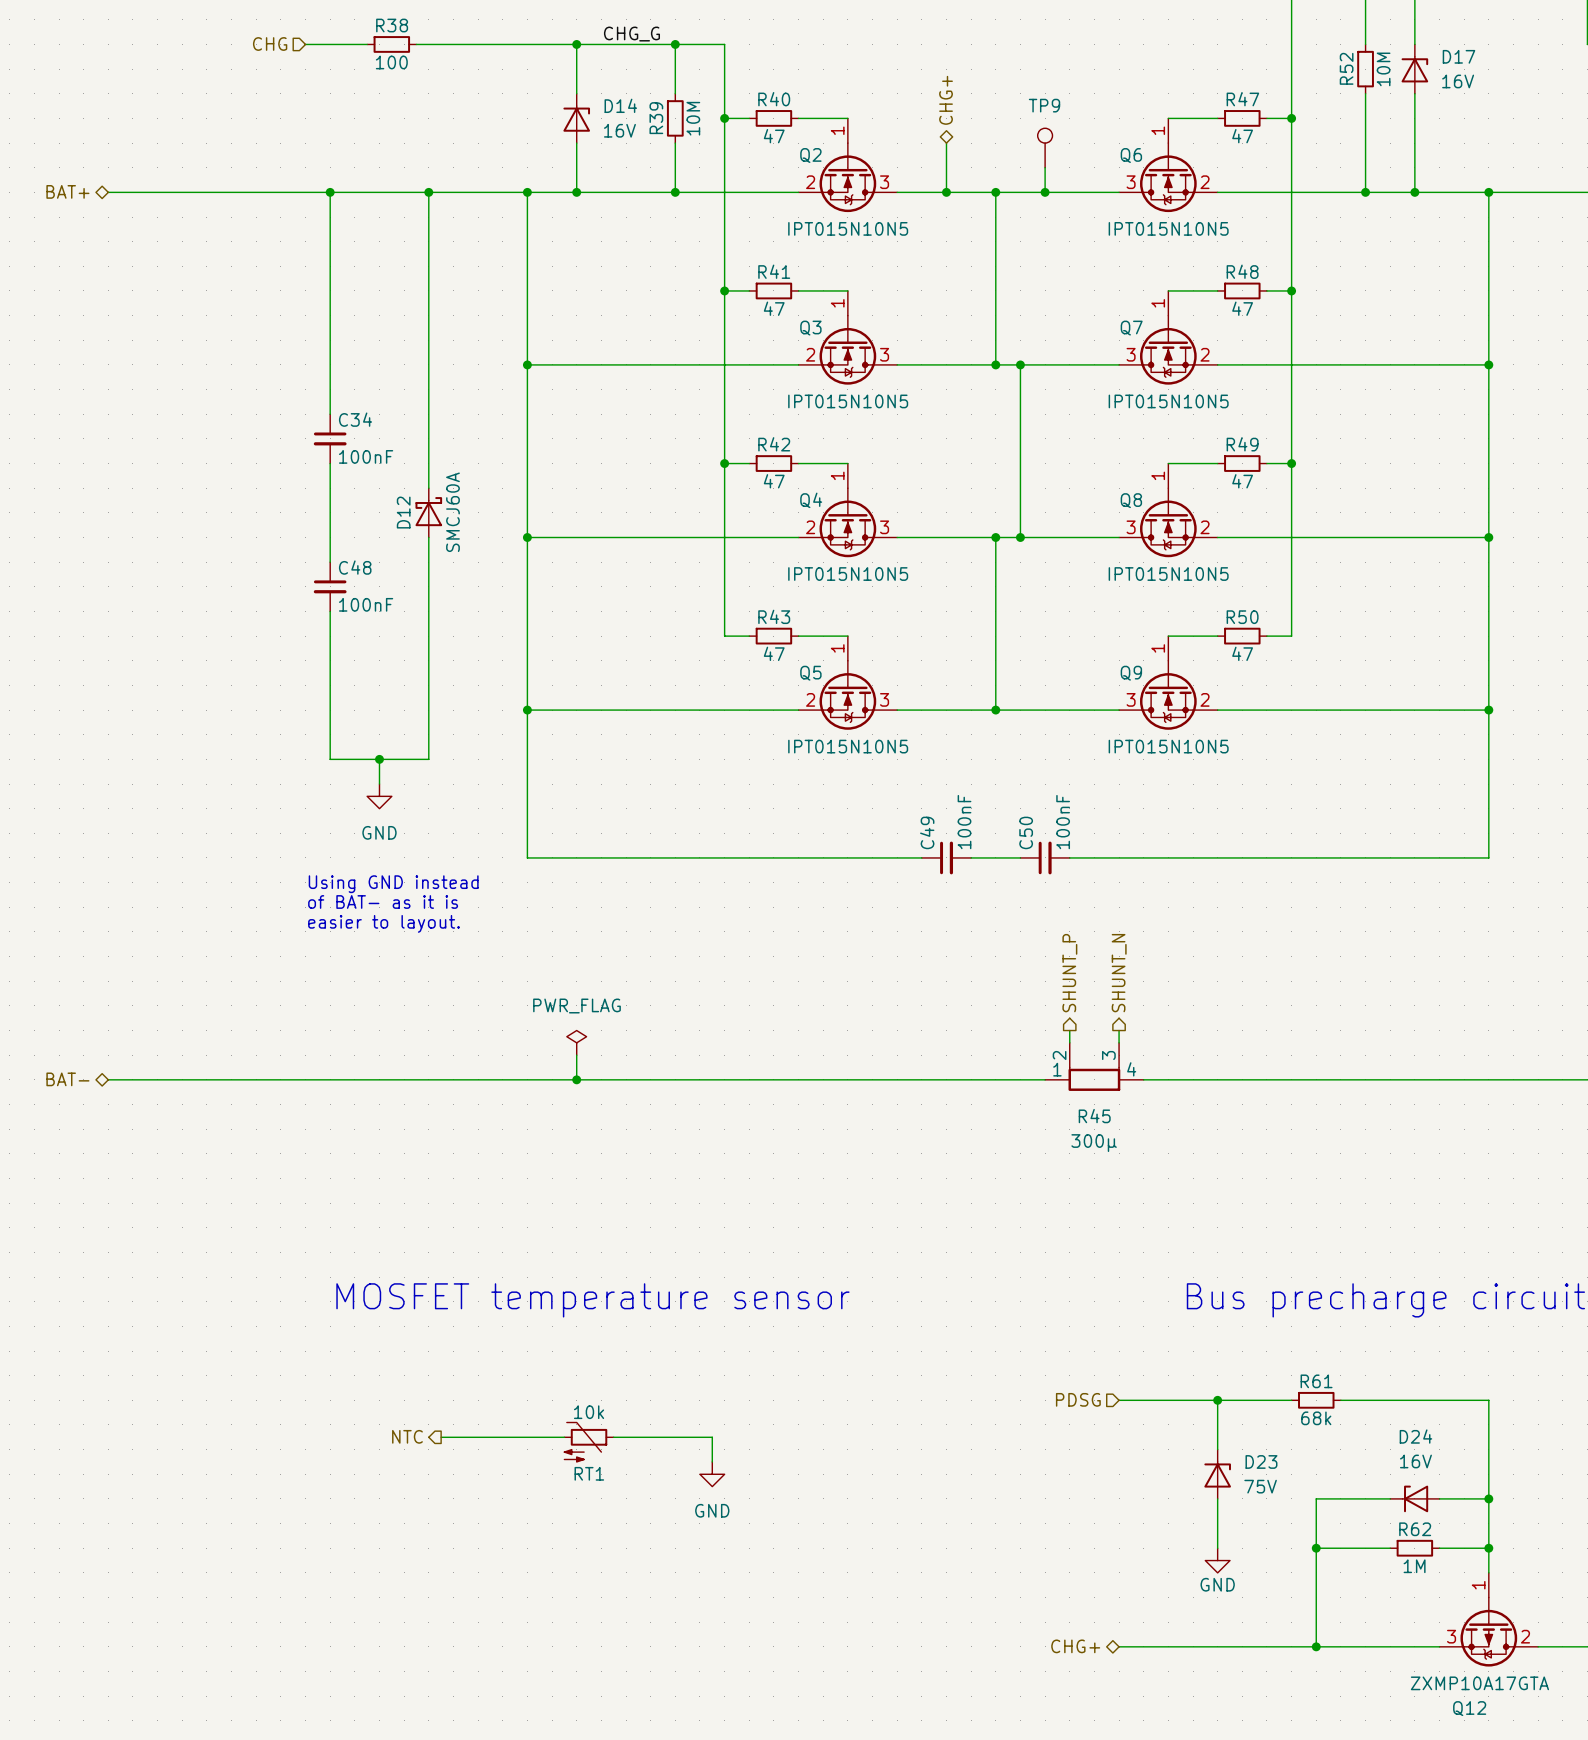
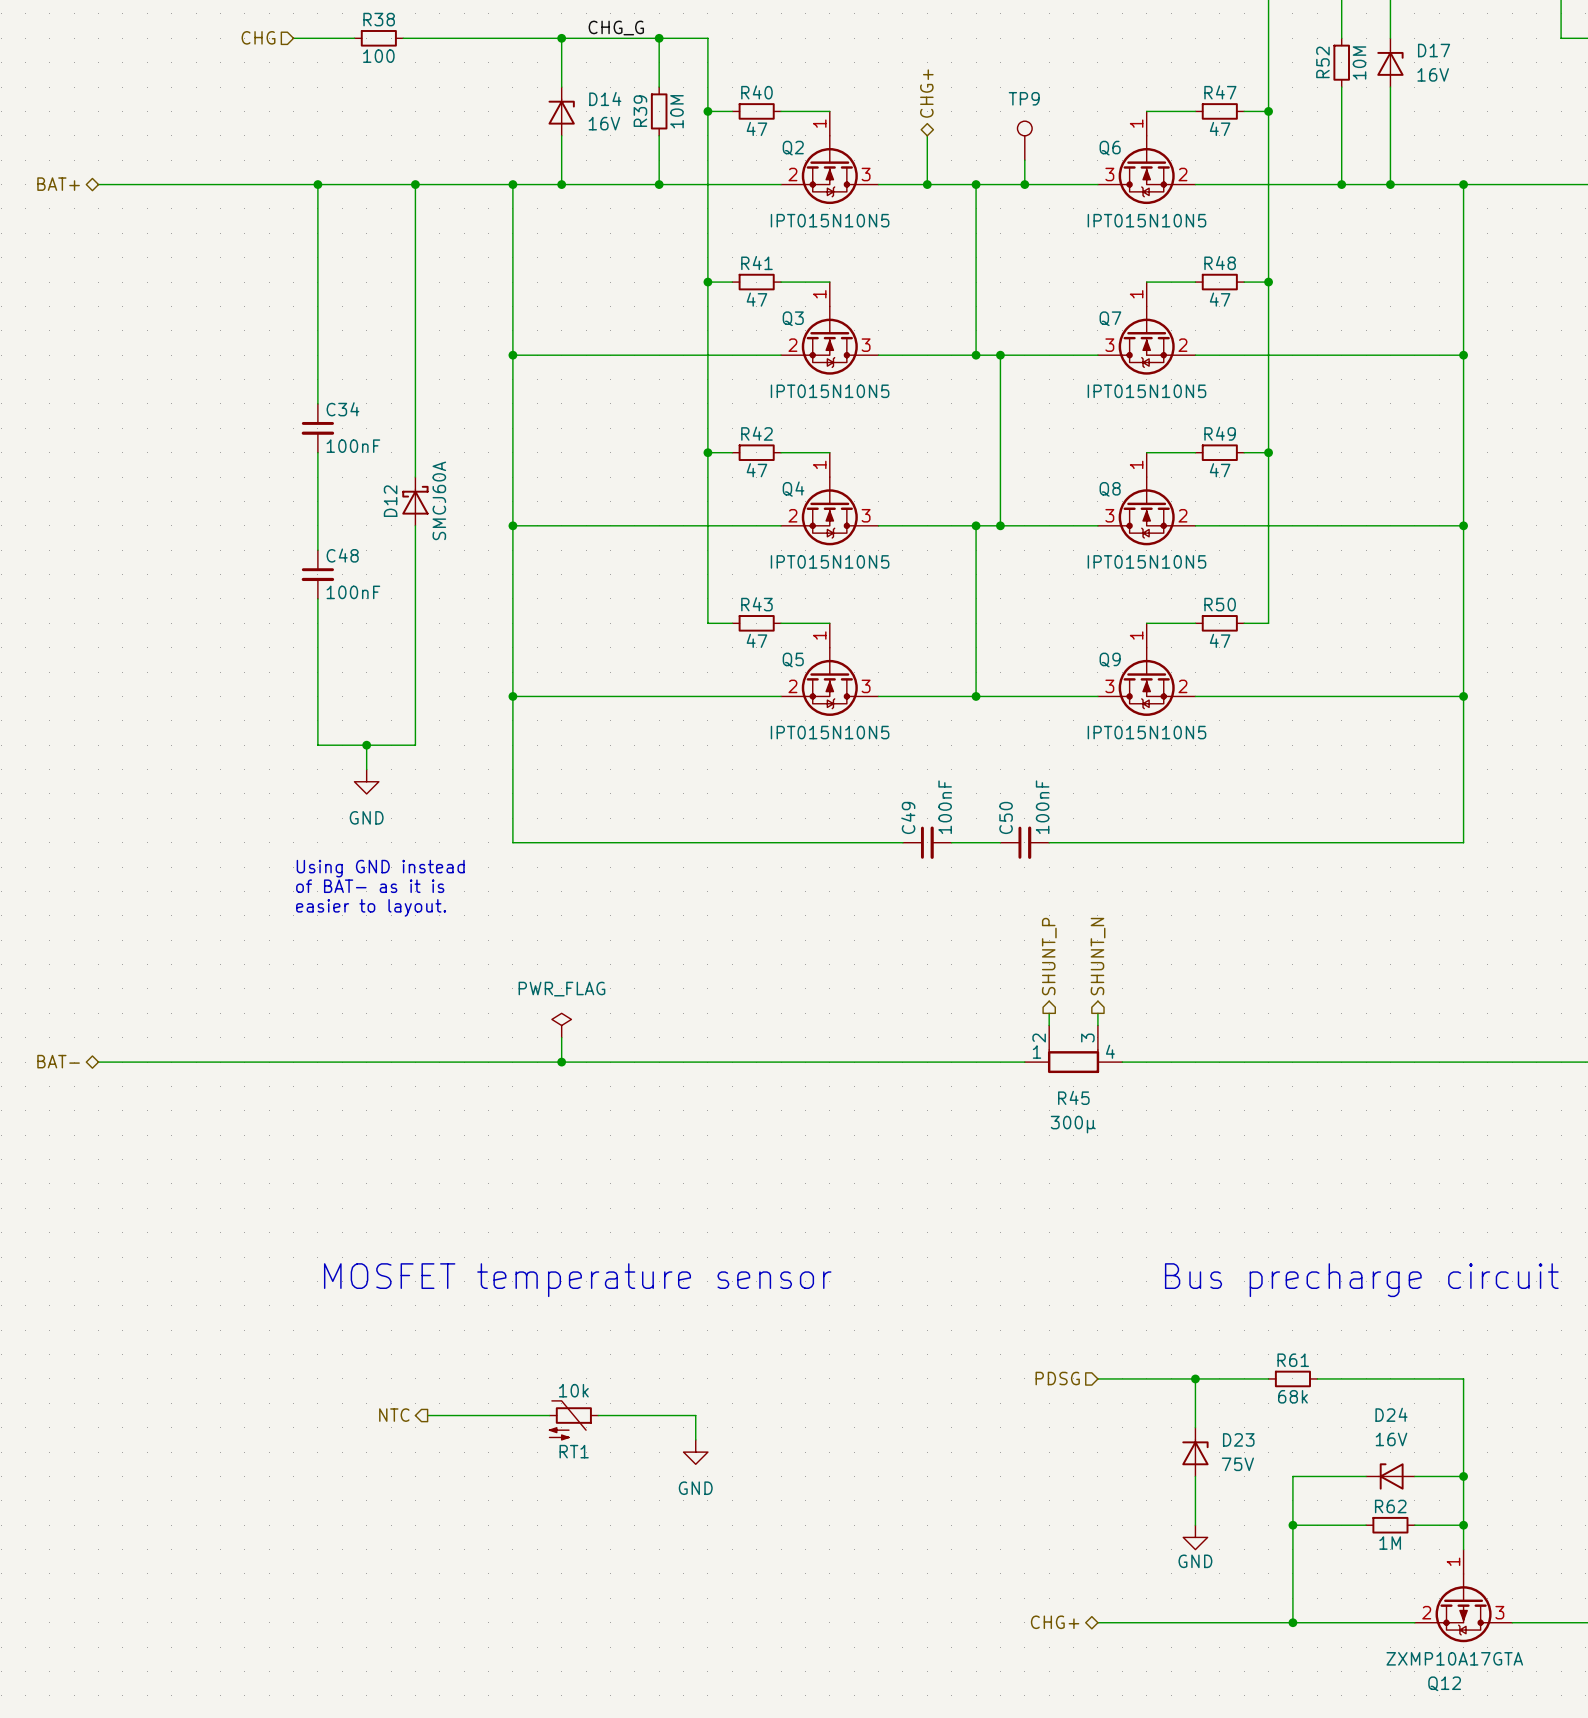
Q12 pin number: 3 (1451, 1636) -> 2 (1426, 1612)
Q12 pin number: 2 (1525, 1636) -> 3 (1499, 1612)

